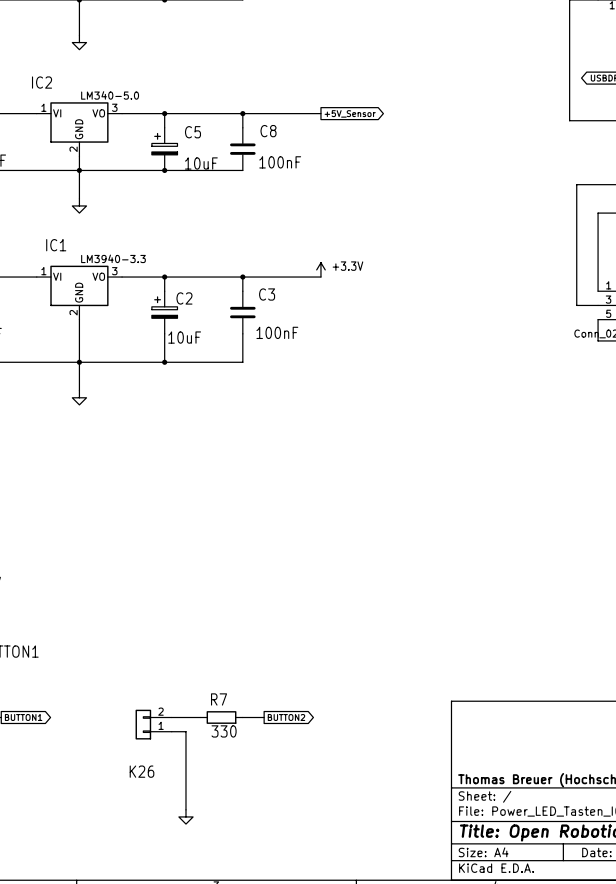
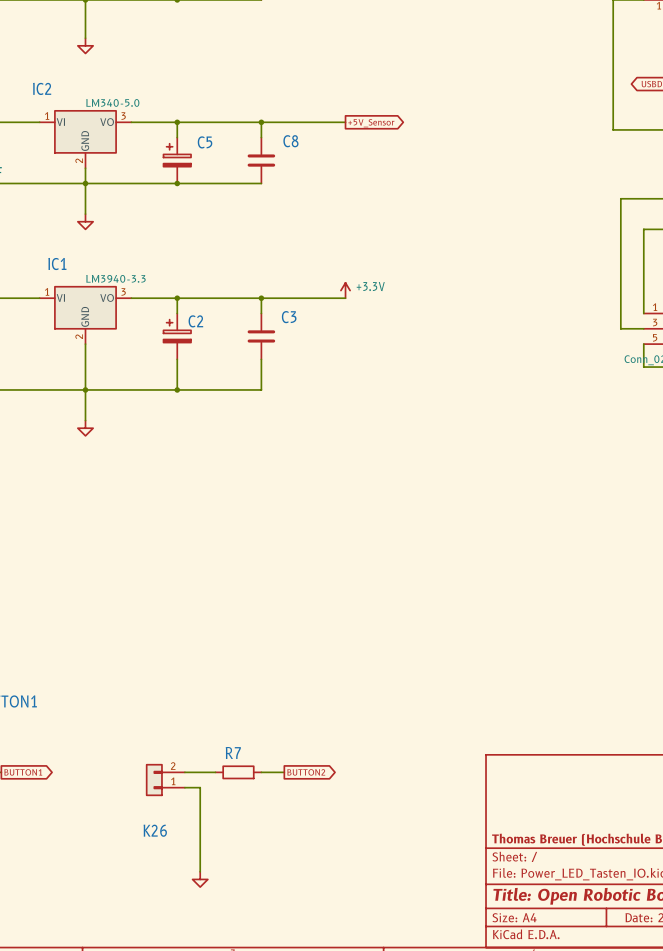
C8 value: 100nF (280, 162) -> none
C5 value: 10uF (201, 163) -> none
C3 value: 100nF (277, 332) -> none
C2 value: 10uF (184, 337) -> none
R7 value: 330 (224, 731) -> none

